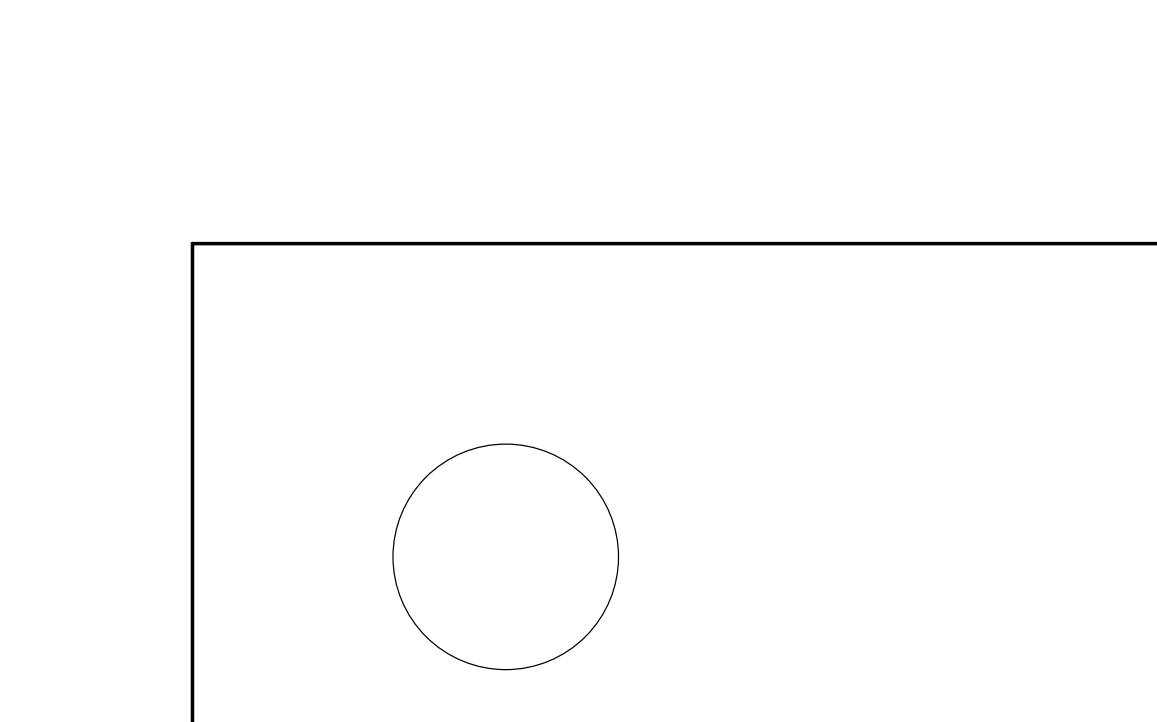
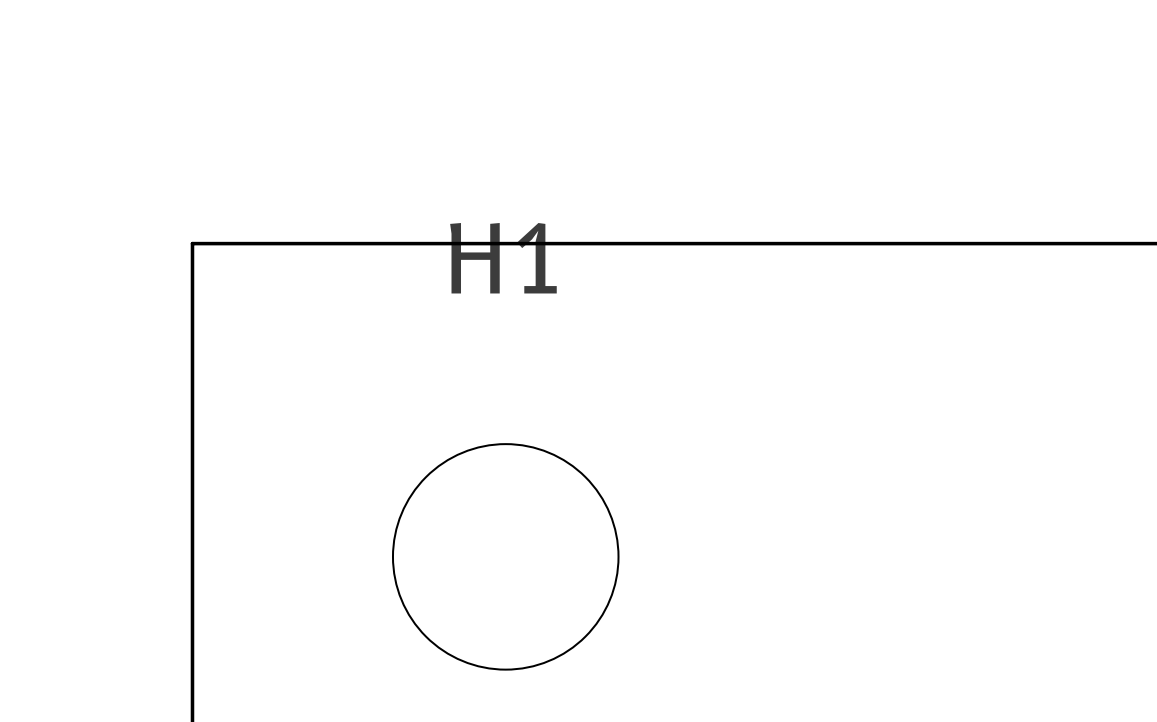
H1 name: none -> H1 (503, 258)

